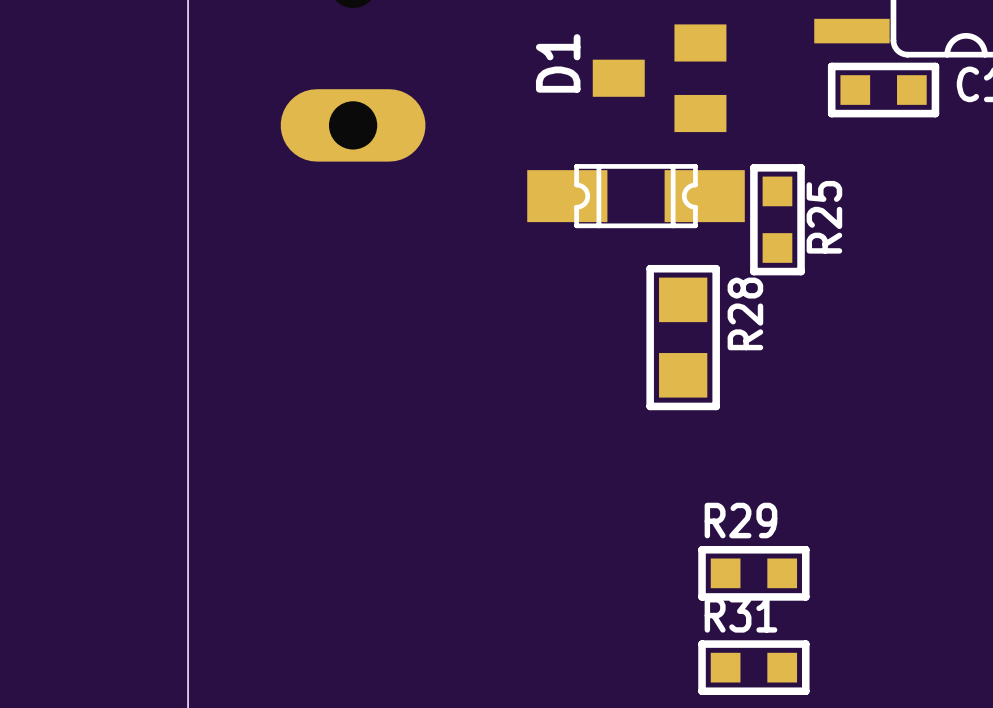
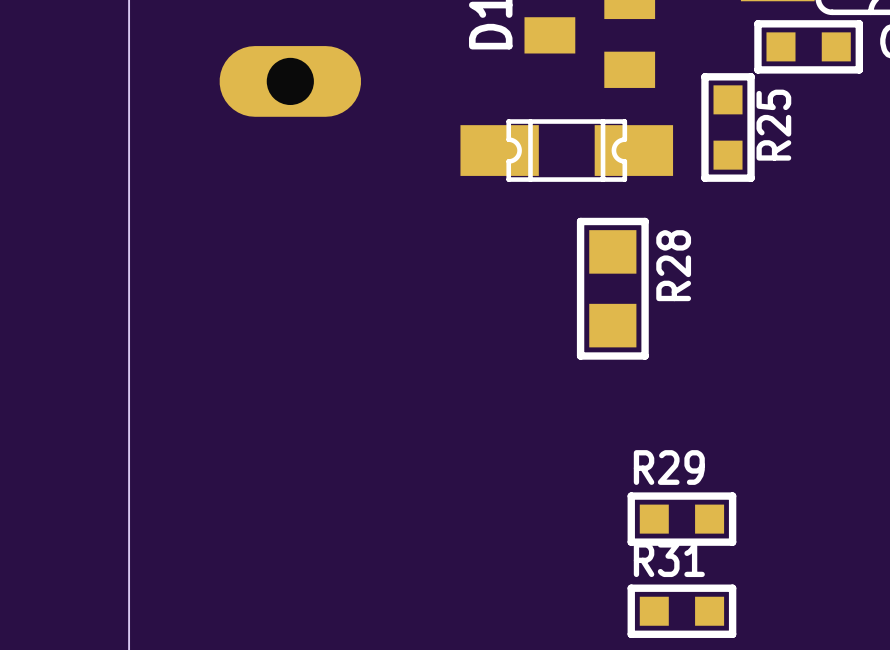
R25 position: (777, 219) -> (728, 127)

